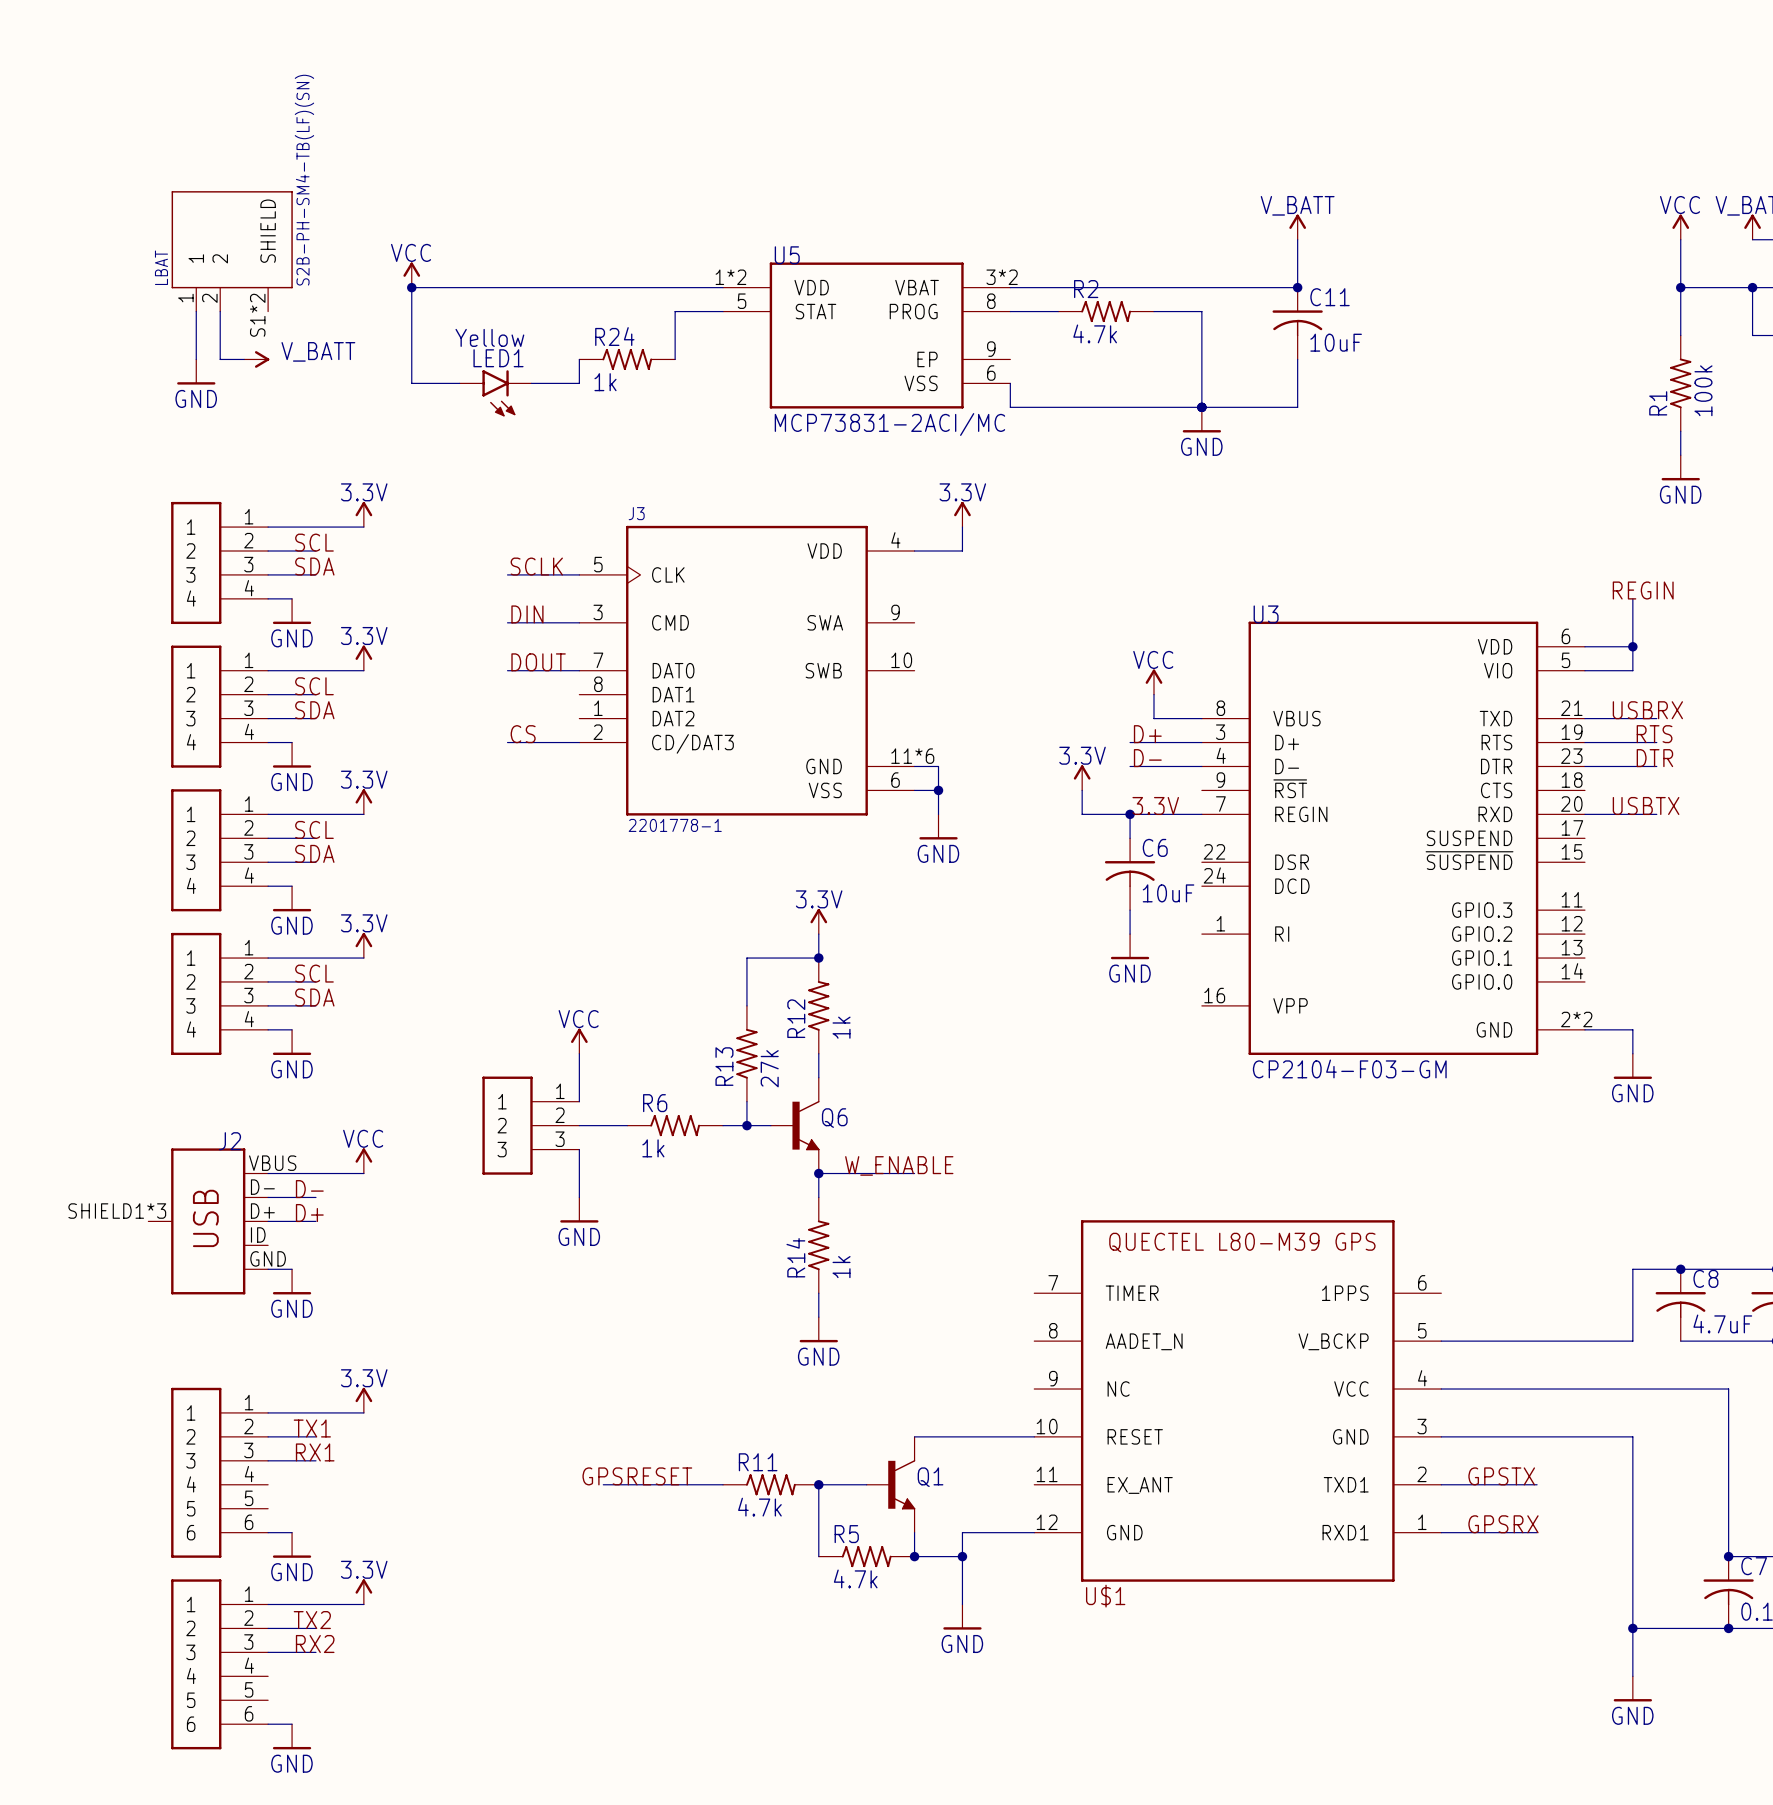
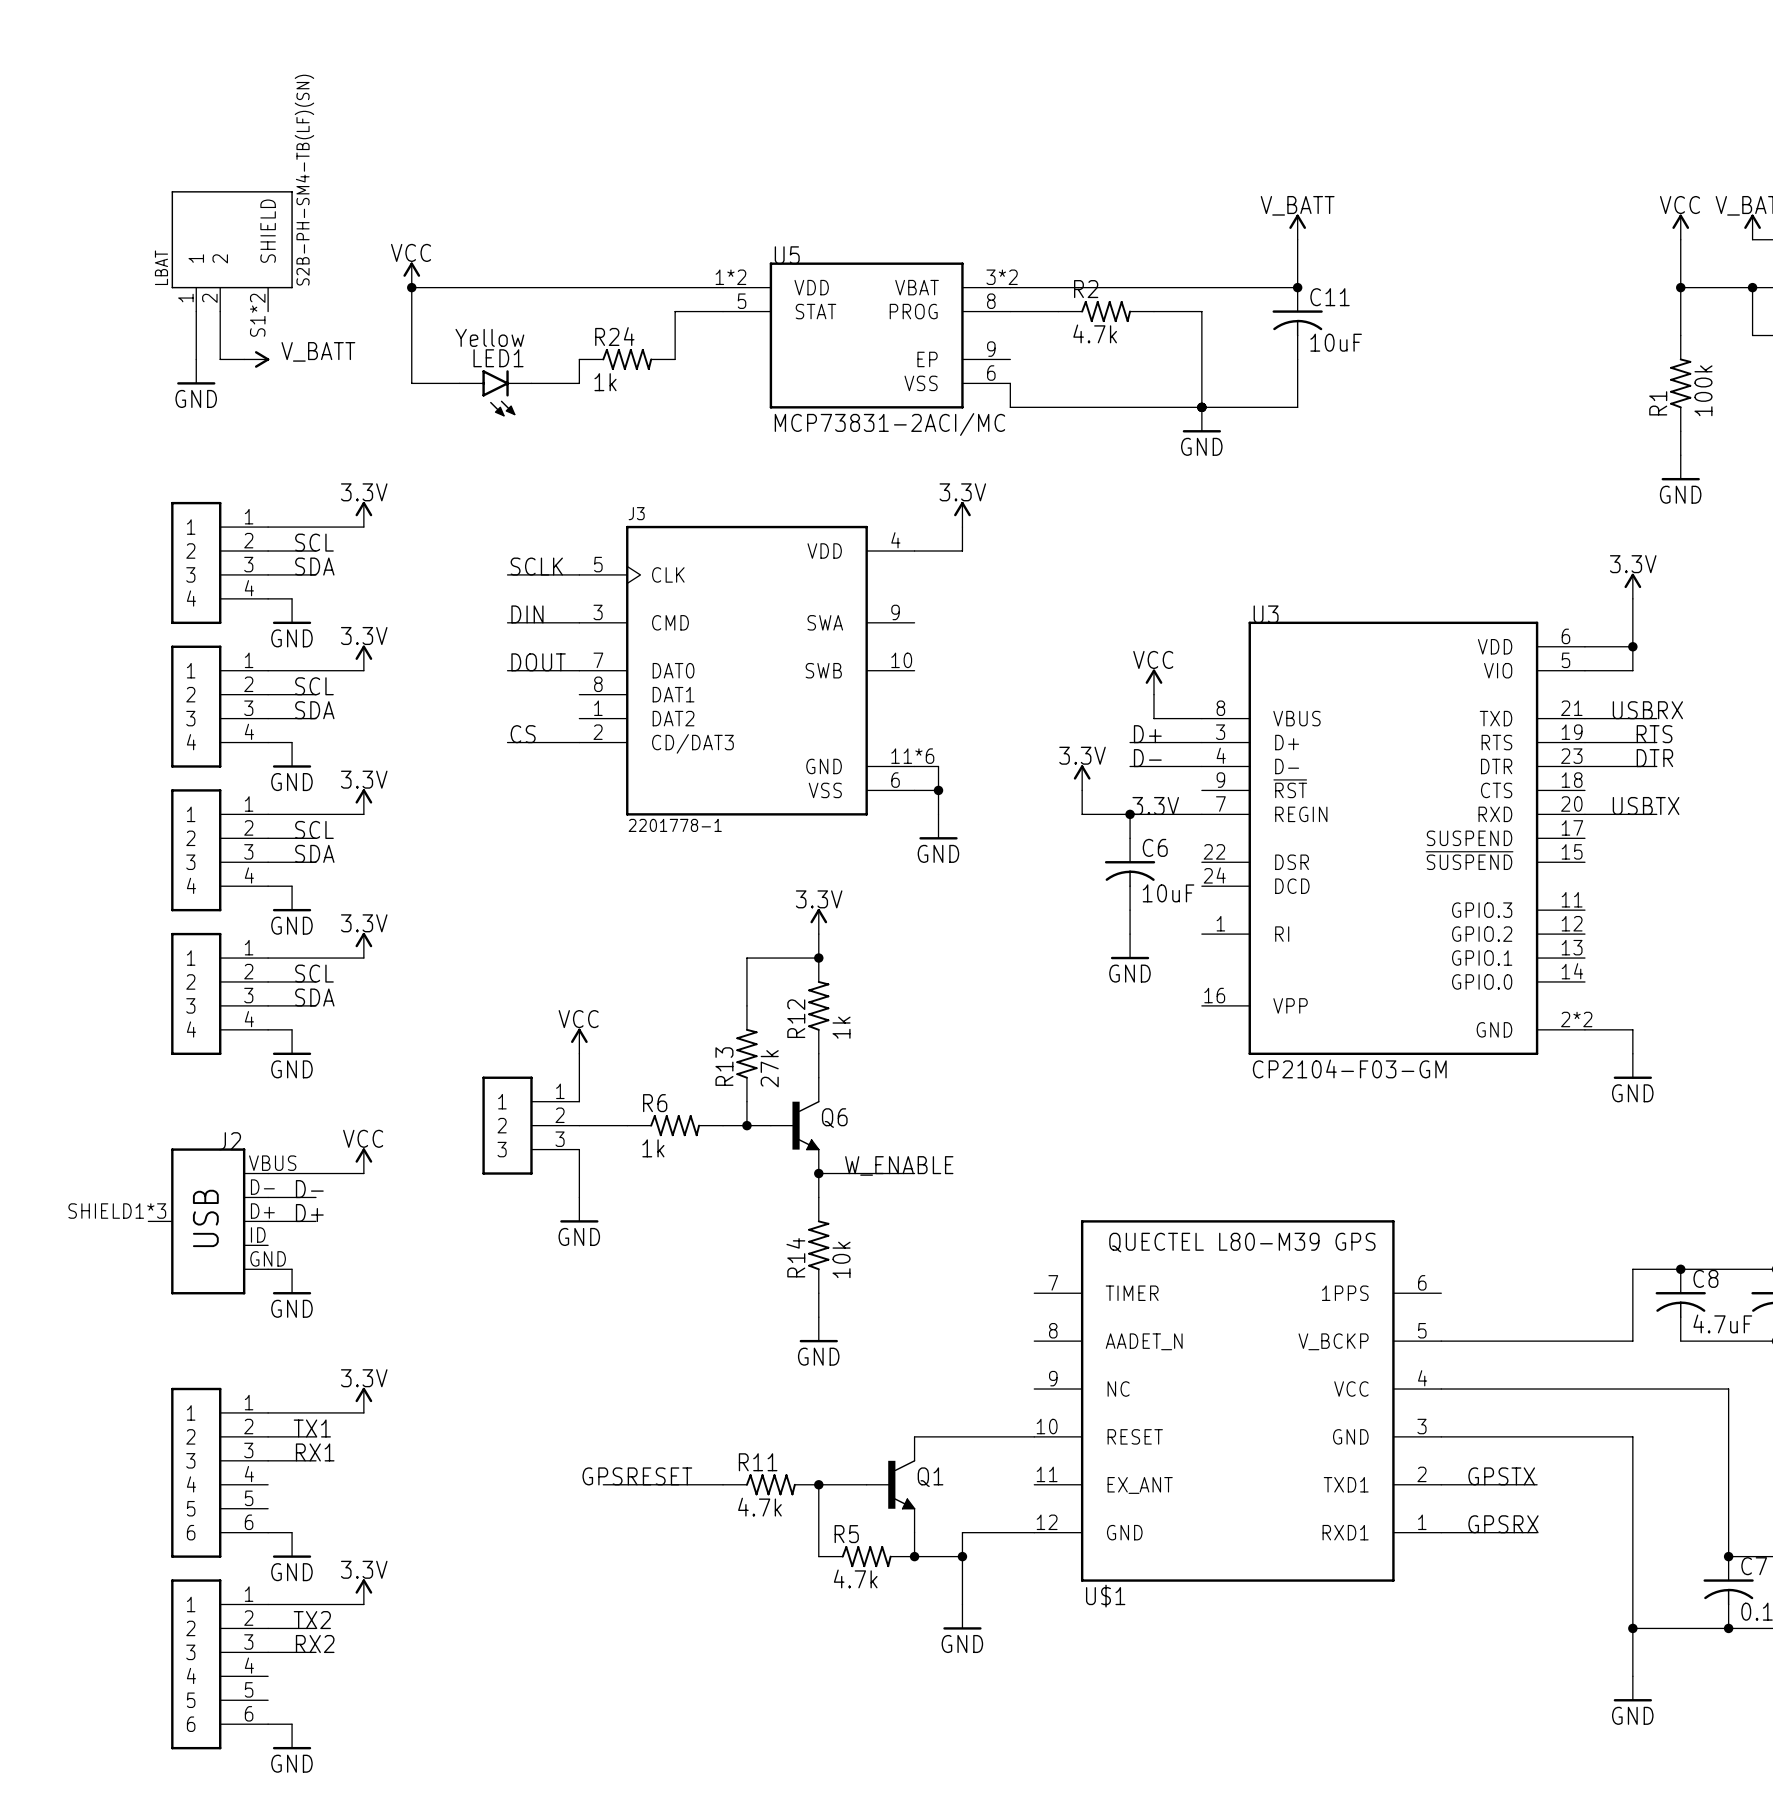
power symbol: none -> 3.3V (1632, 586)
label: REGIN (1643, 590) -> none
R14 value: 1k (841, 1267) -> 10k (841, 1259)

